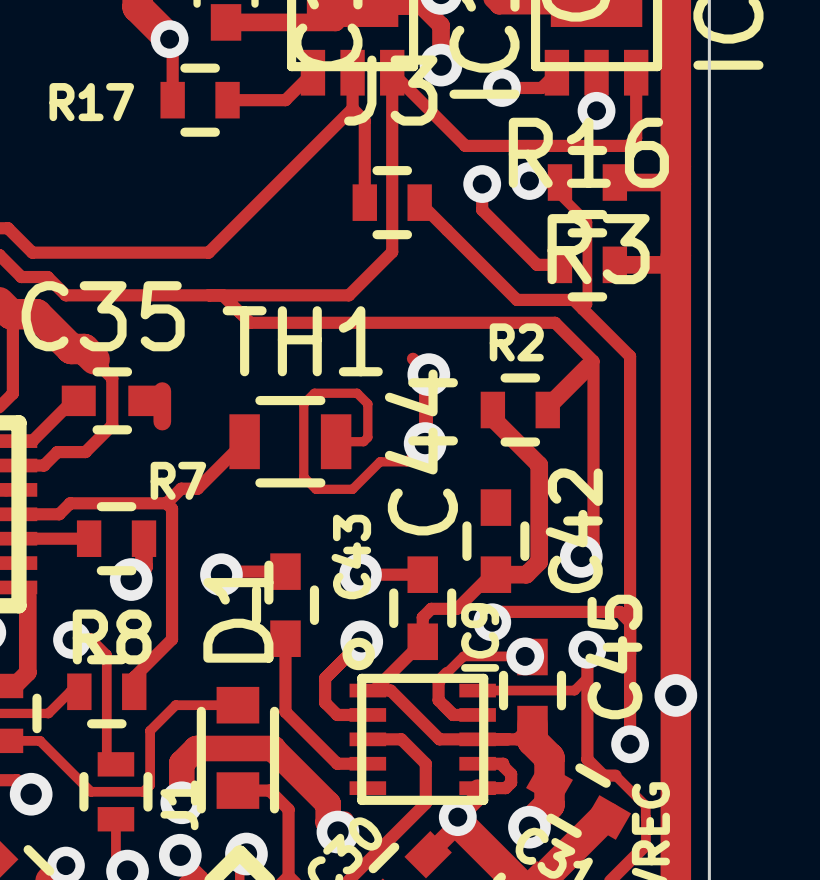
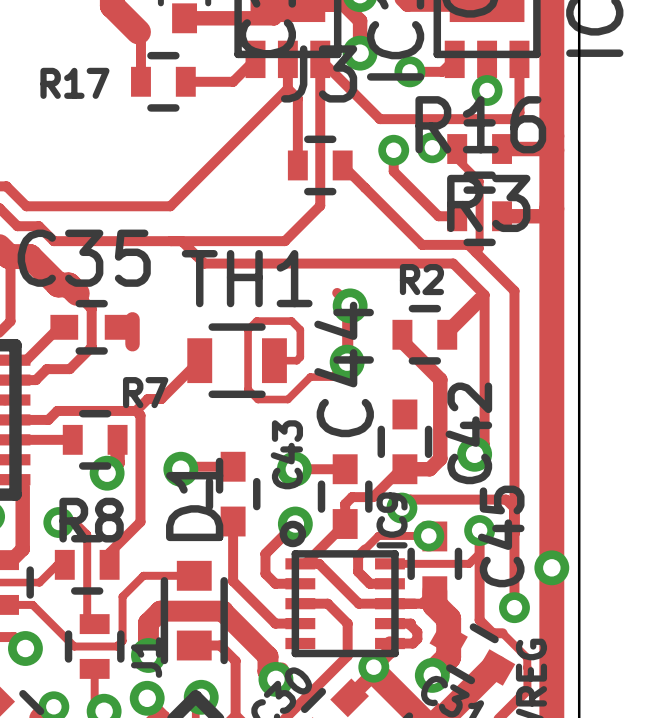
via: (169, 39) -> none

